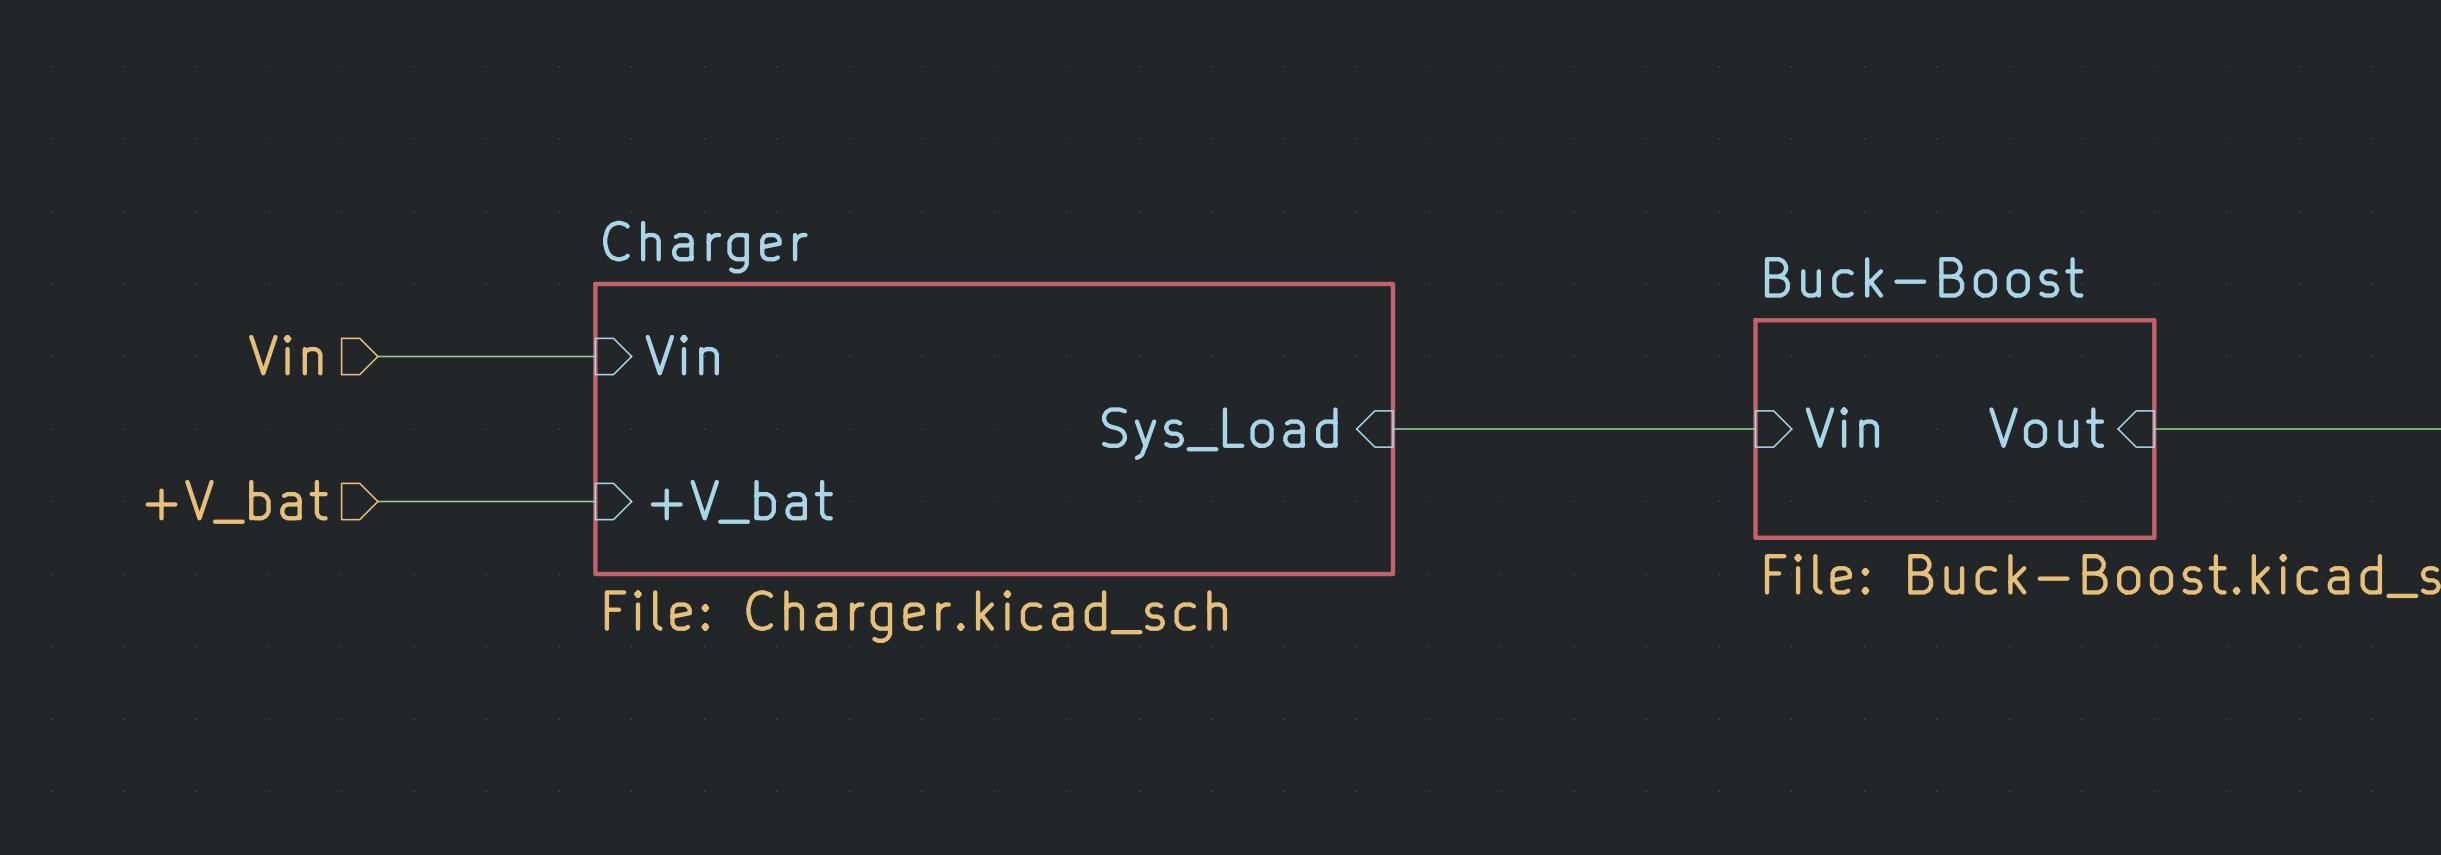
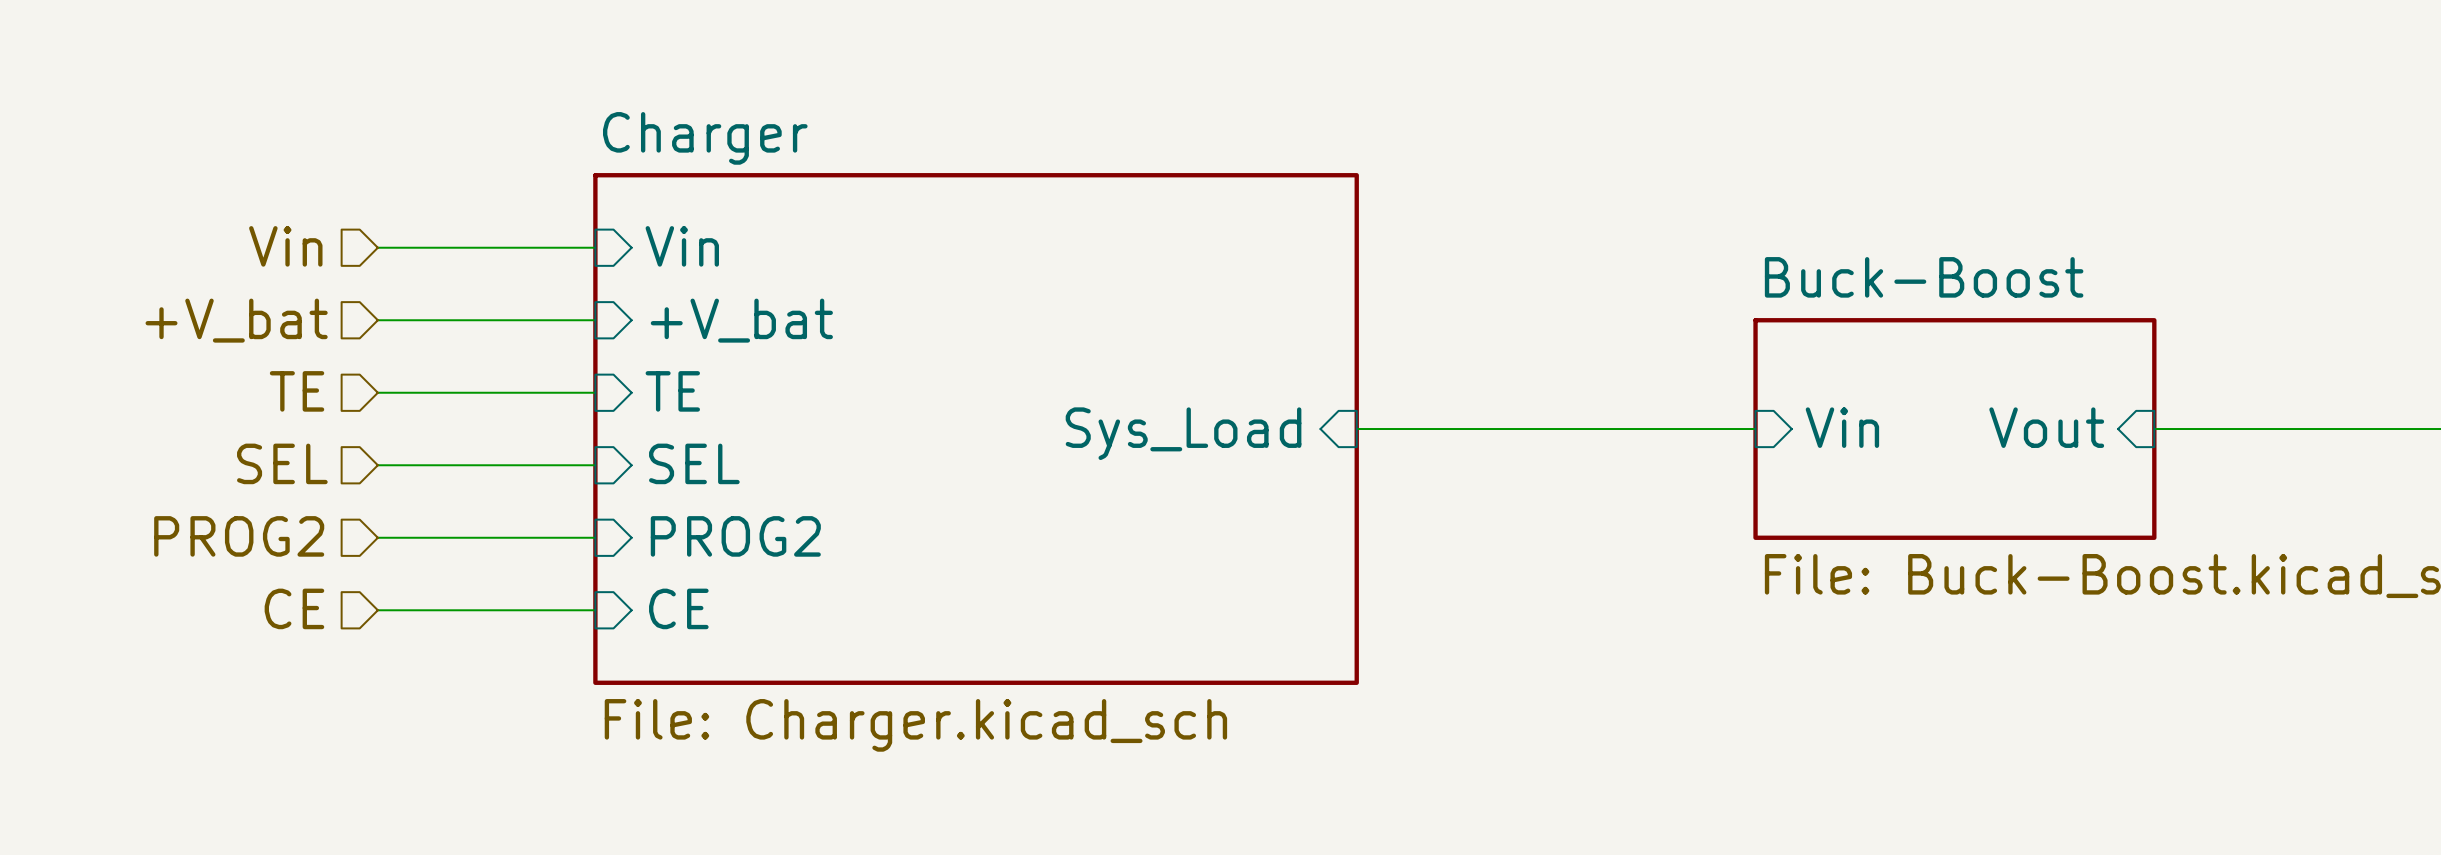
wire: none -> (377, 247) (595, 247)
sheet Charger name position: Charger (705, 247) -> Charger (705, 138)
sheet Charger shape: [593, 281, 1396, 577] -> [593, 173, 1359, 685]
hierarchical label position: Vin (285, 355) -> Vin (285, 246)
sheet pin position: Vin (682, 355) -> Vin (682, 246)
wire: (377, 356) (595, 356) -> (377, 320) (595, 320)
hierarchical label: none -> TE (297, 391)
sheet pin: none -> TE (672, 391)
wire: none -> (377, 392) (595, 392)
wire: none -> (1356, 429) (1392, 429)
sheet pin position: Sys_Load (1219, 433) -> Sys_Load (1183, 433)
hierarchical label: none -> SEL (282, 463)
sheet pin: none -> SEL (694, 463)
wire: none -> (377, 465) (595, 465)
hierarchical label position: +V_bat (236, 501) -> +V_bat (236, 320)
wire: (377, 501) (595, 501) -> (377, 537) (595, 537)
sheet pin position: +V_bat (741, 501) -> +V_bat (741, 320)
hierarchical label: none -> PROG2 (239, 536)
sheet pin: none -> PROG2 (735, 536)
hierarchical label: none -> CE (294, 608)
sheet pin: none -> CE (678, 608)
wire: none -> (377, 610) (595, 610)
sheet Charger value position: File: Charger.kicad_sch (915, 616) -> File: Charger.kicad_sch (915, 725)

